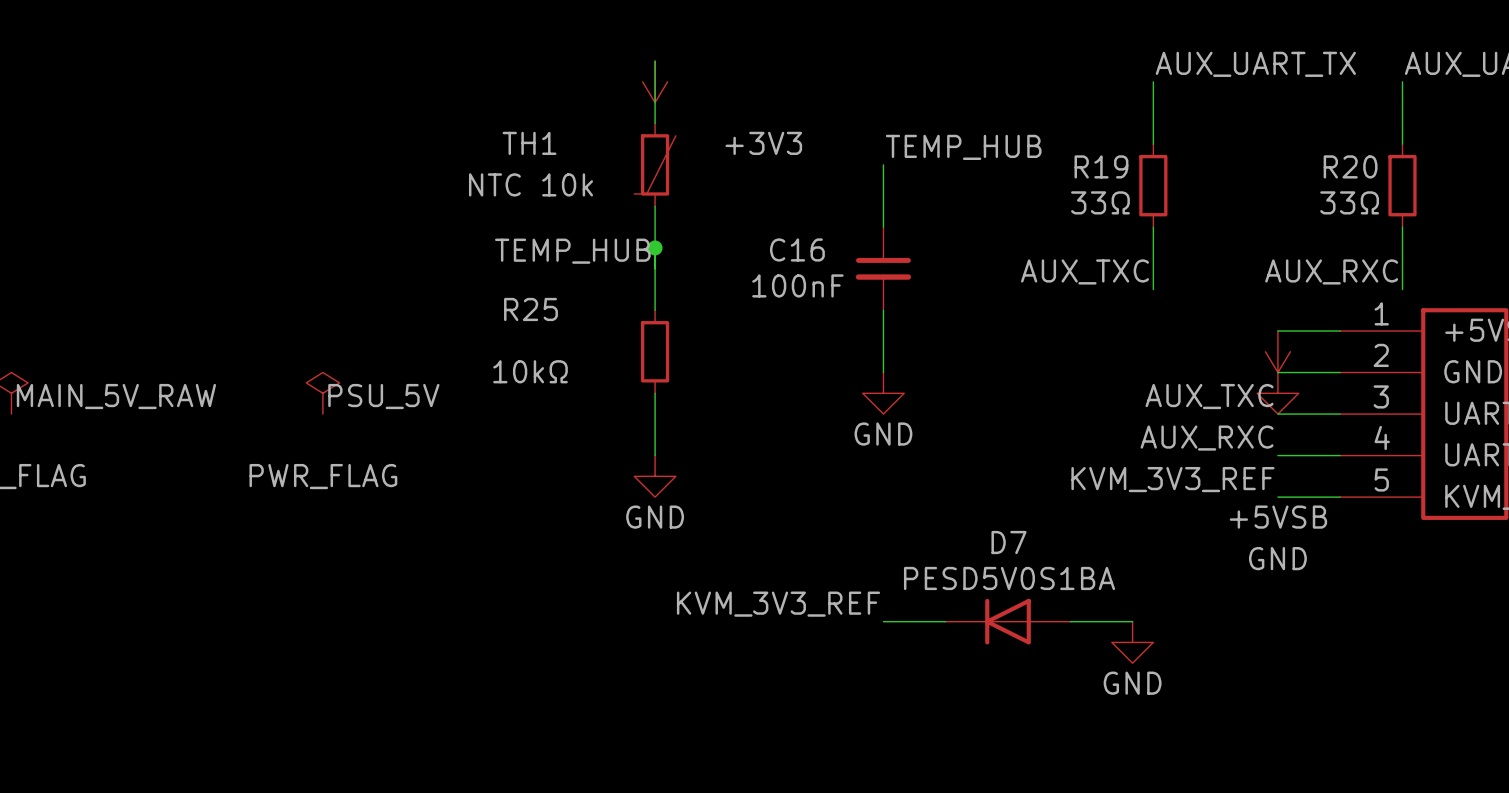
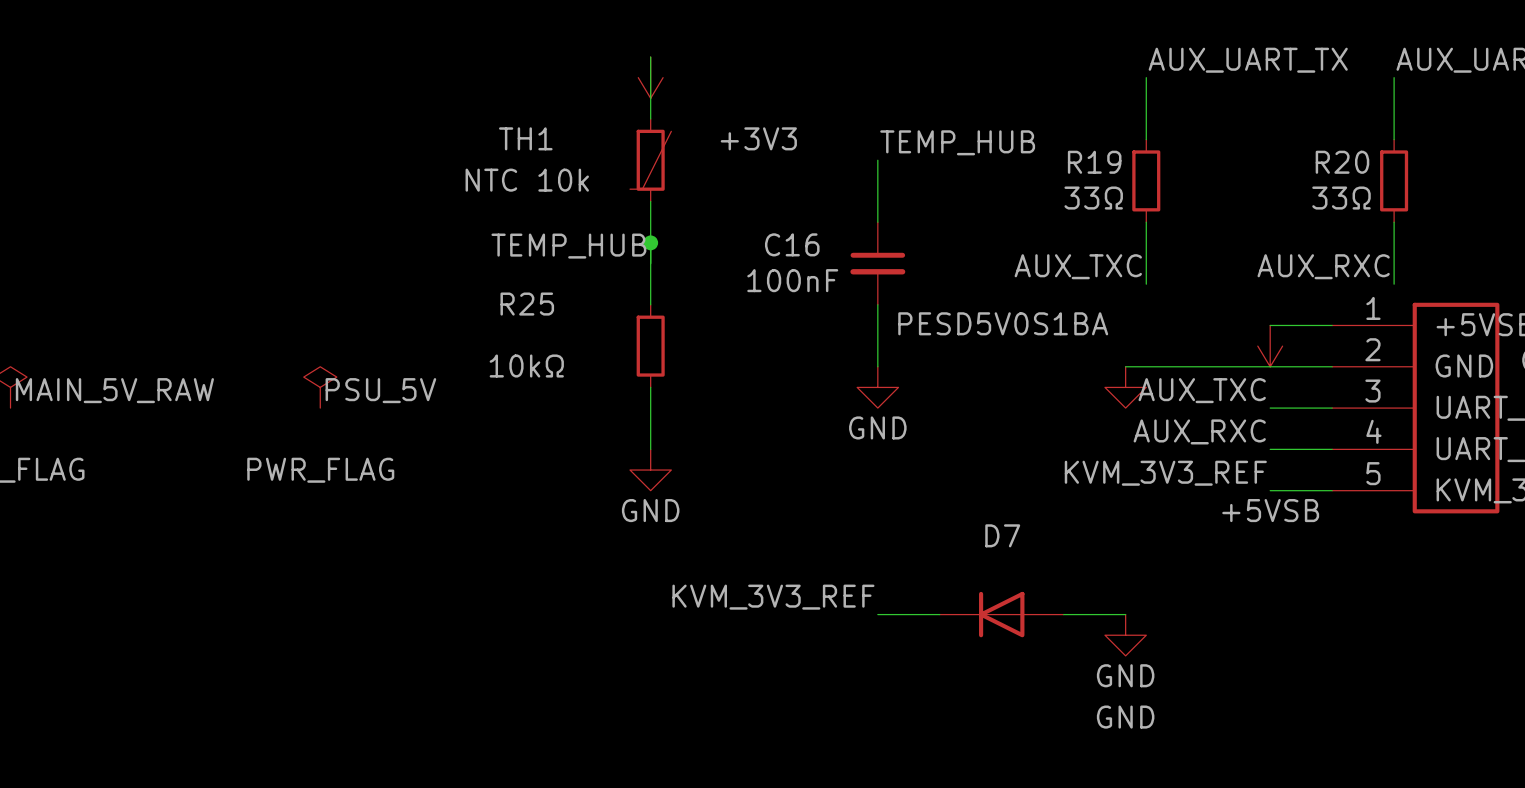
wire: none -> (1125, 366) (1270, 366)
power symbol position: GND (1277, 393) -> GND (1125, 387)
power symbol text position: GND (1277, 558) -> GND (1125, 717)
D7 value position: PESD5V0S1BA (1009, 578) -> PESD5V0S1BA (1003, 323)

